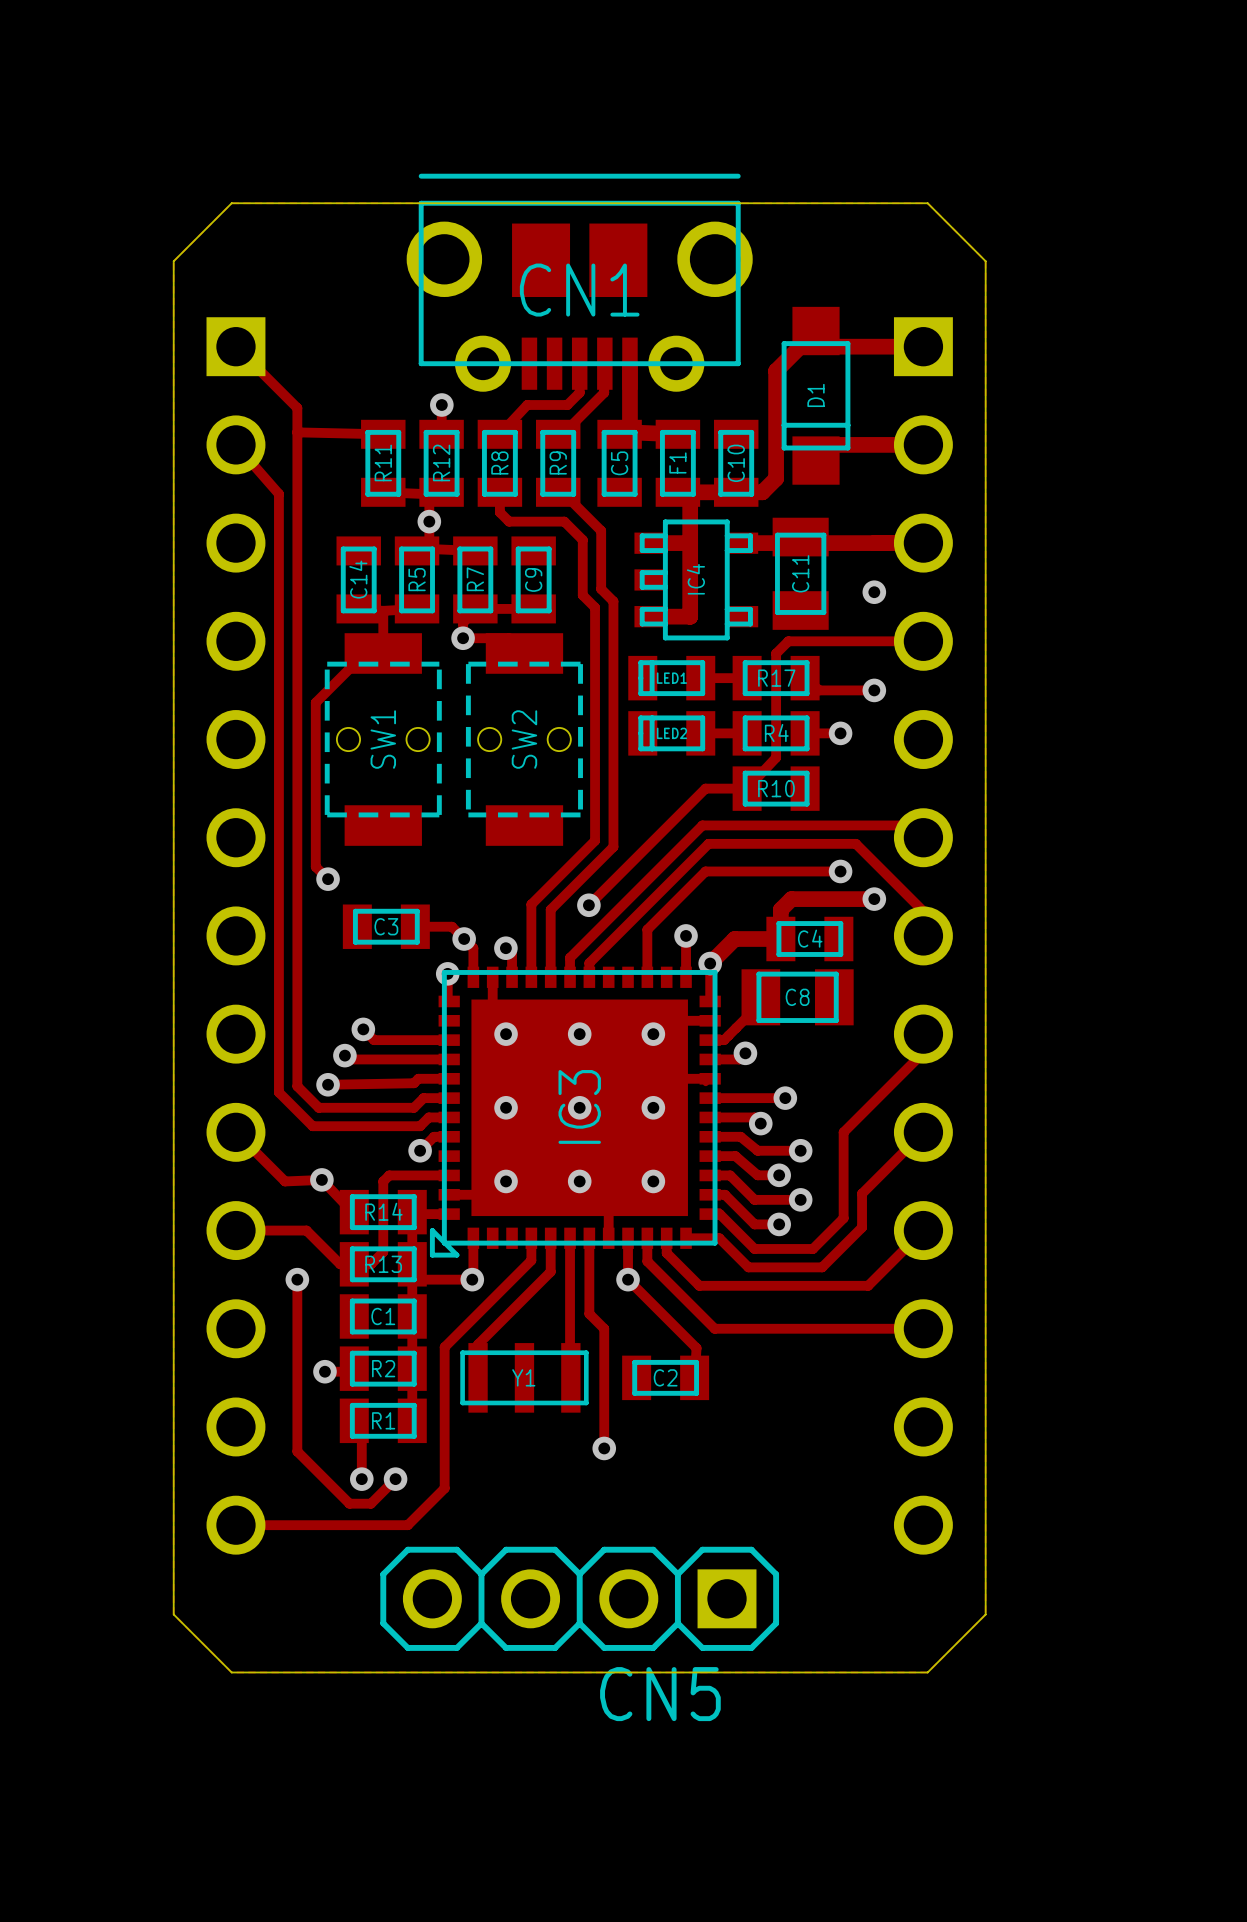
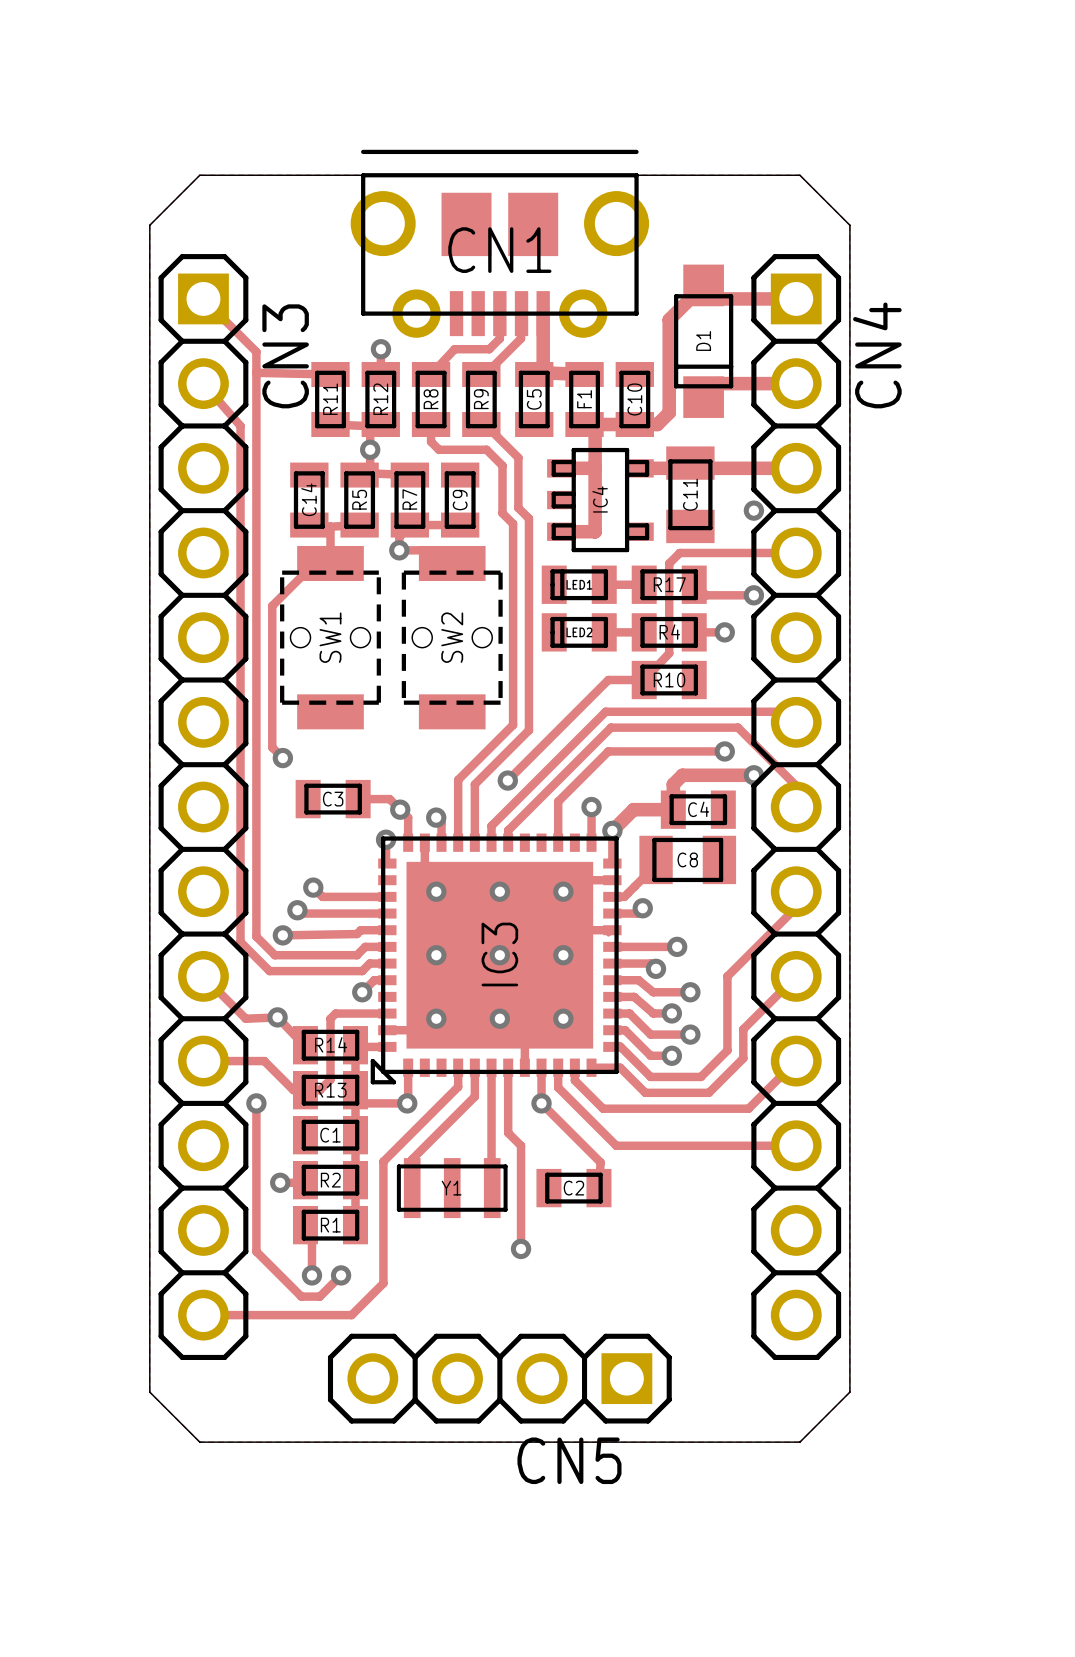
CN3 side: bottom (235, 935) -> top (203, 807)
CN4 side: bottom (923, 935) -> top (796, 807)

